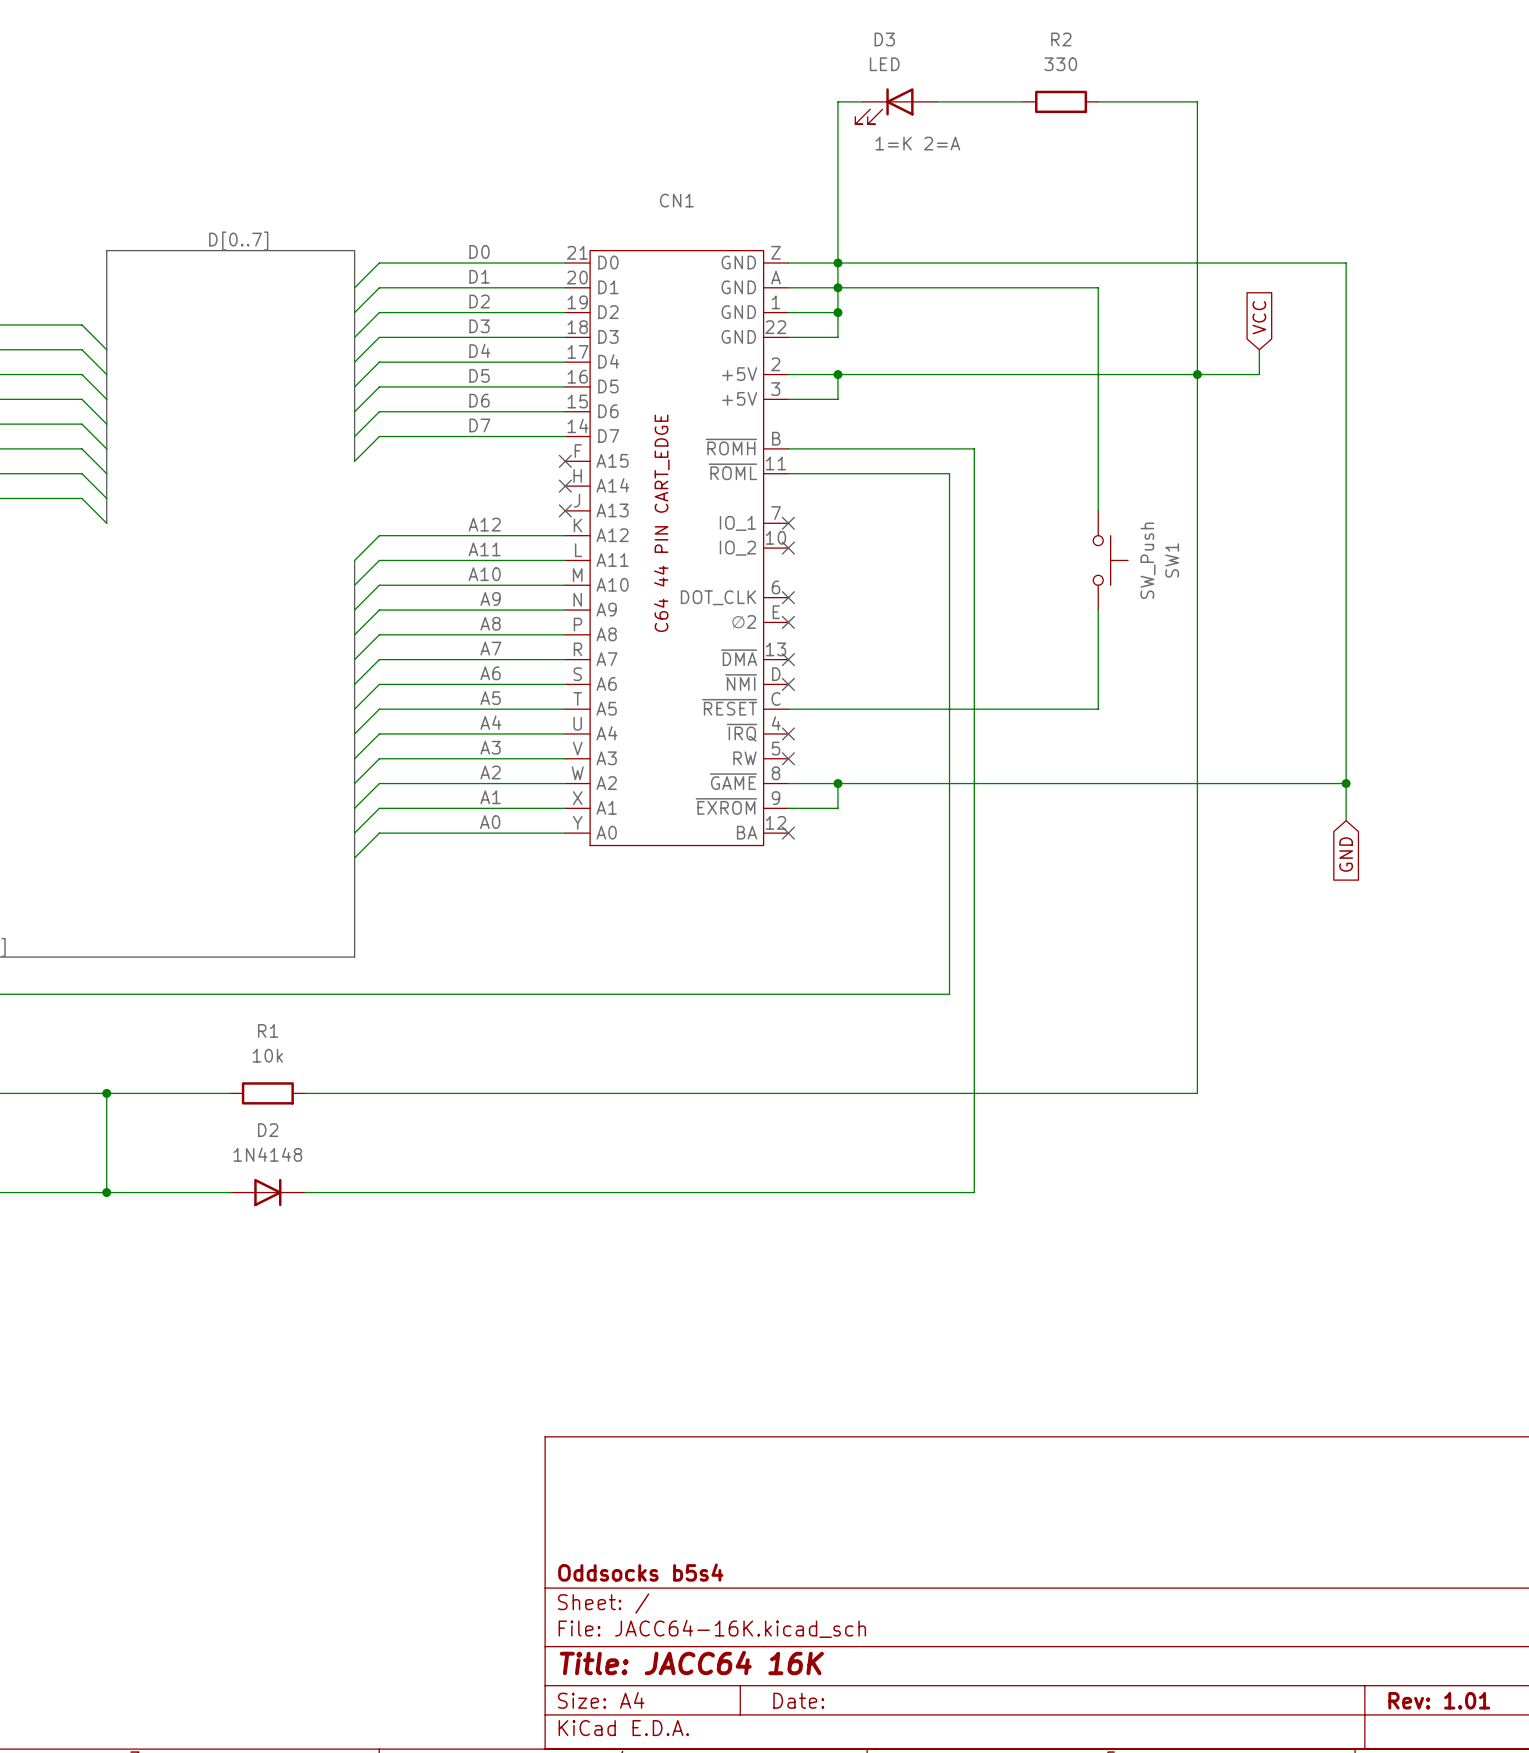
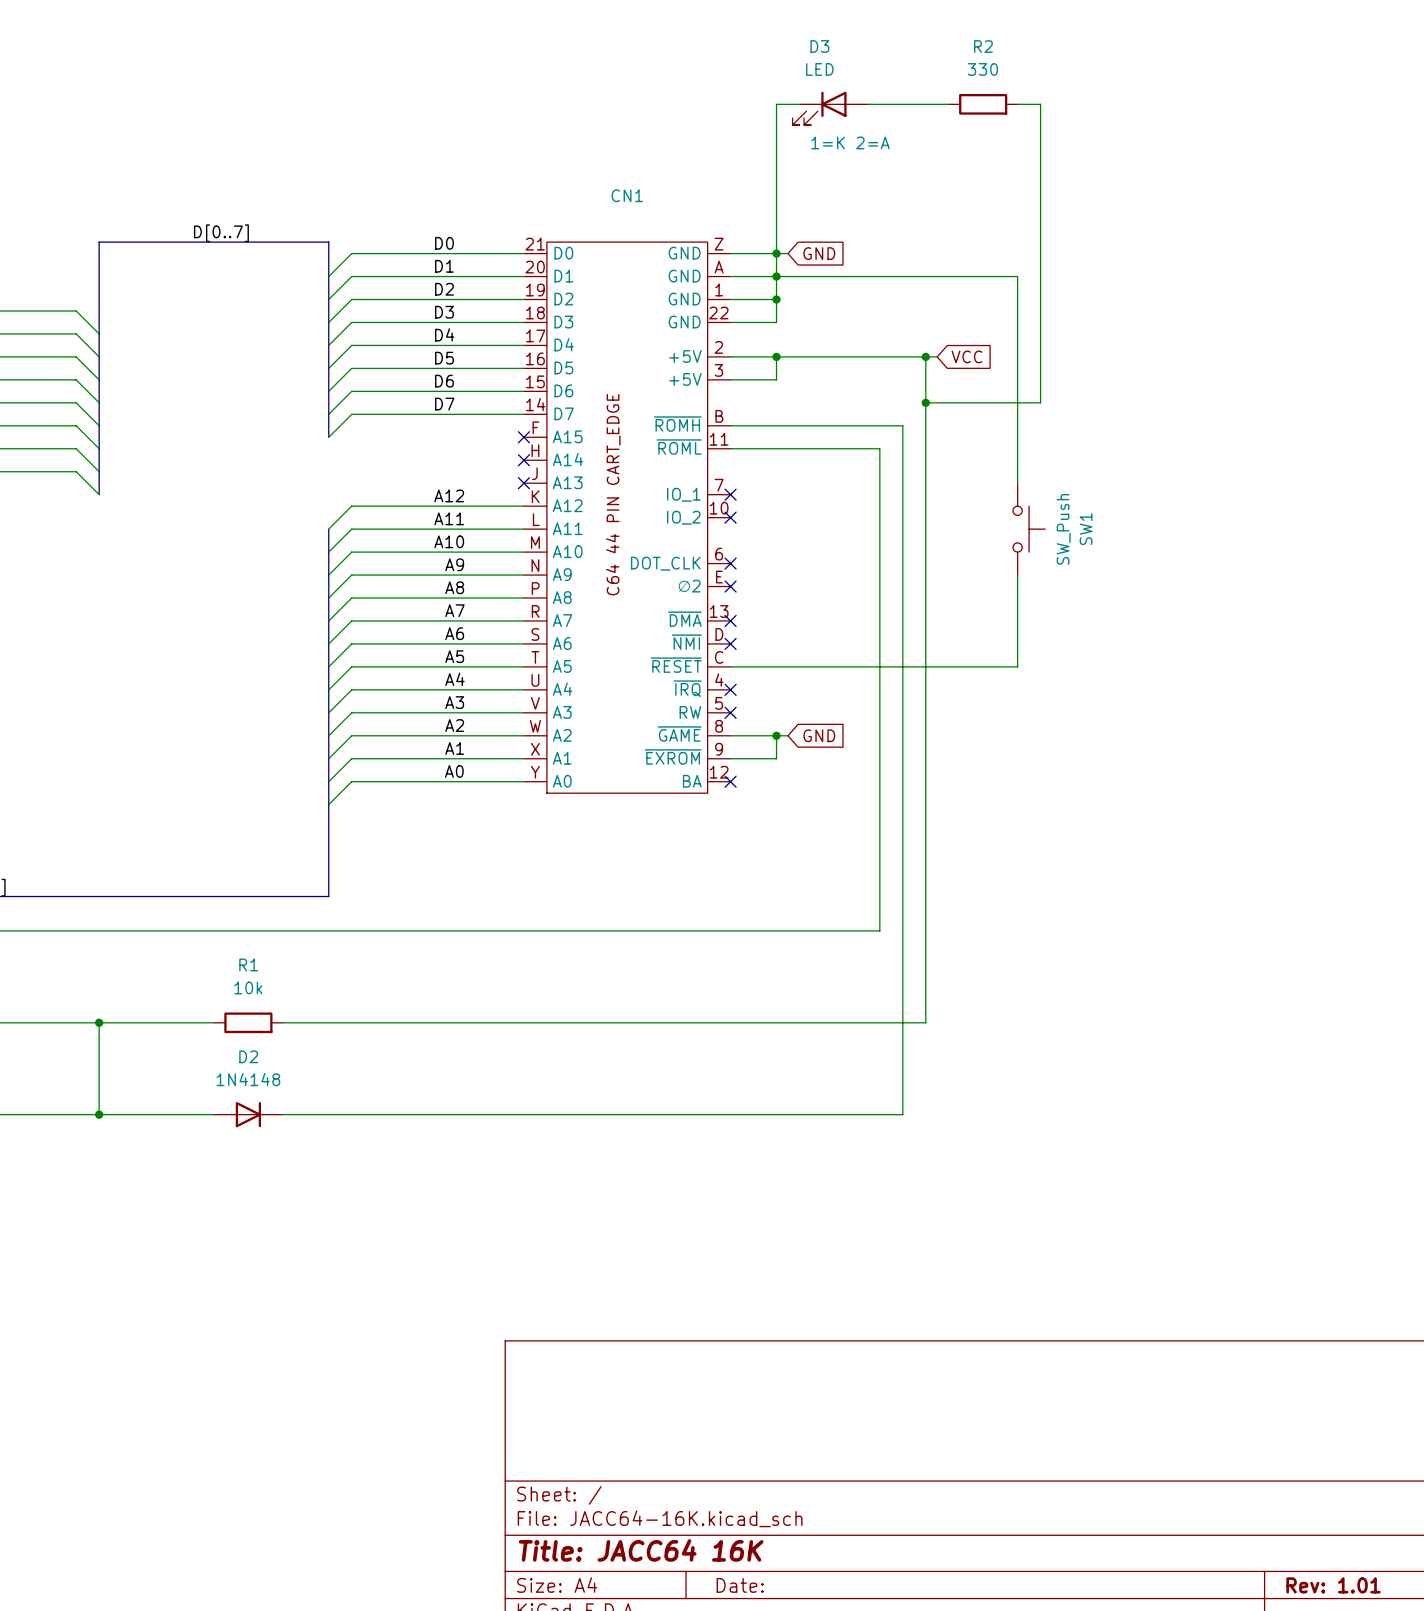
wire: (1123, 101) (1197, 101) (1197, 1093) (999, 1093) -> (925, 356) (925, 1022)
wire: none -> (1040, 104) (1040, 402) (925, 402)
wire: (850, 263) (1346, 263) (1346, 820) -> none
global label: none -> GND (819, 253)
global label: VCC (1259, 317) -> none
wire: (1259, 349) (1259, 374) (1011, 374) -> none
junction: none -> (925, 356)
global label: none -> VCC (966, 356)
junction: (1197, 374) -> none
junction: none -> (925, 402)
wire: (850, 783) (1346, 783) -> none
global label: none -> GND (819, 735)
junction: (1346, 783) -> none
global label: GND (1346, 854) -> none
title block: Oddsocks b5s4 (640, 1572) -> none

